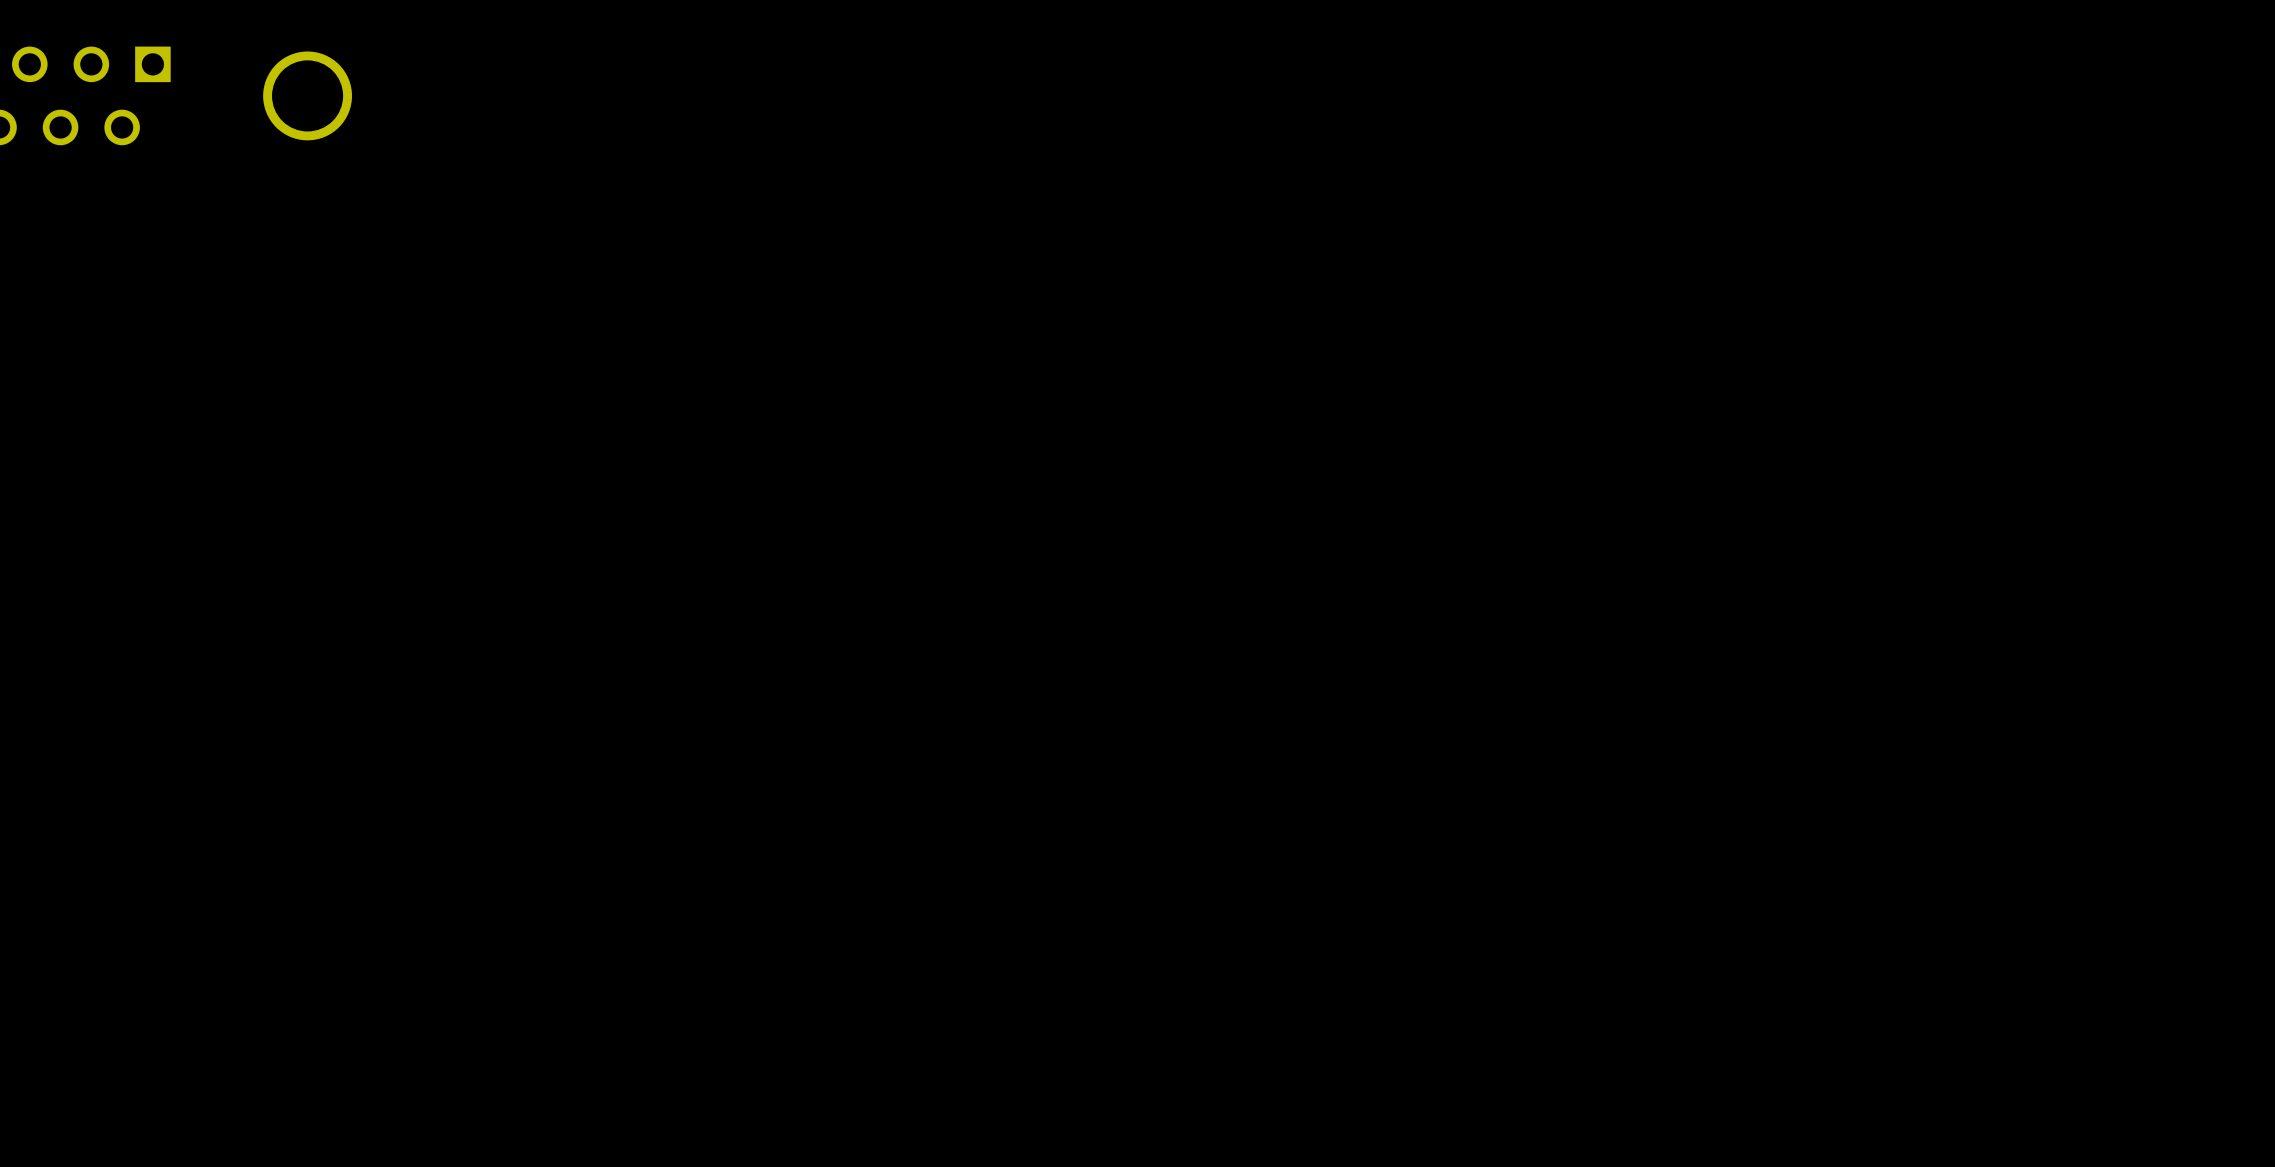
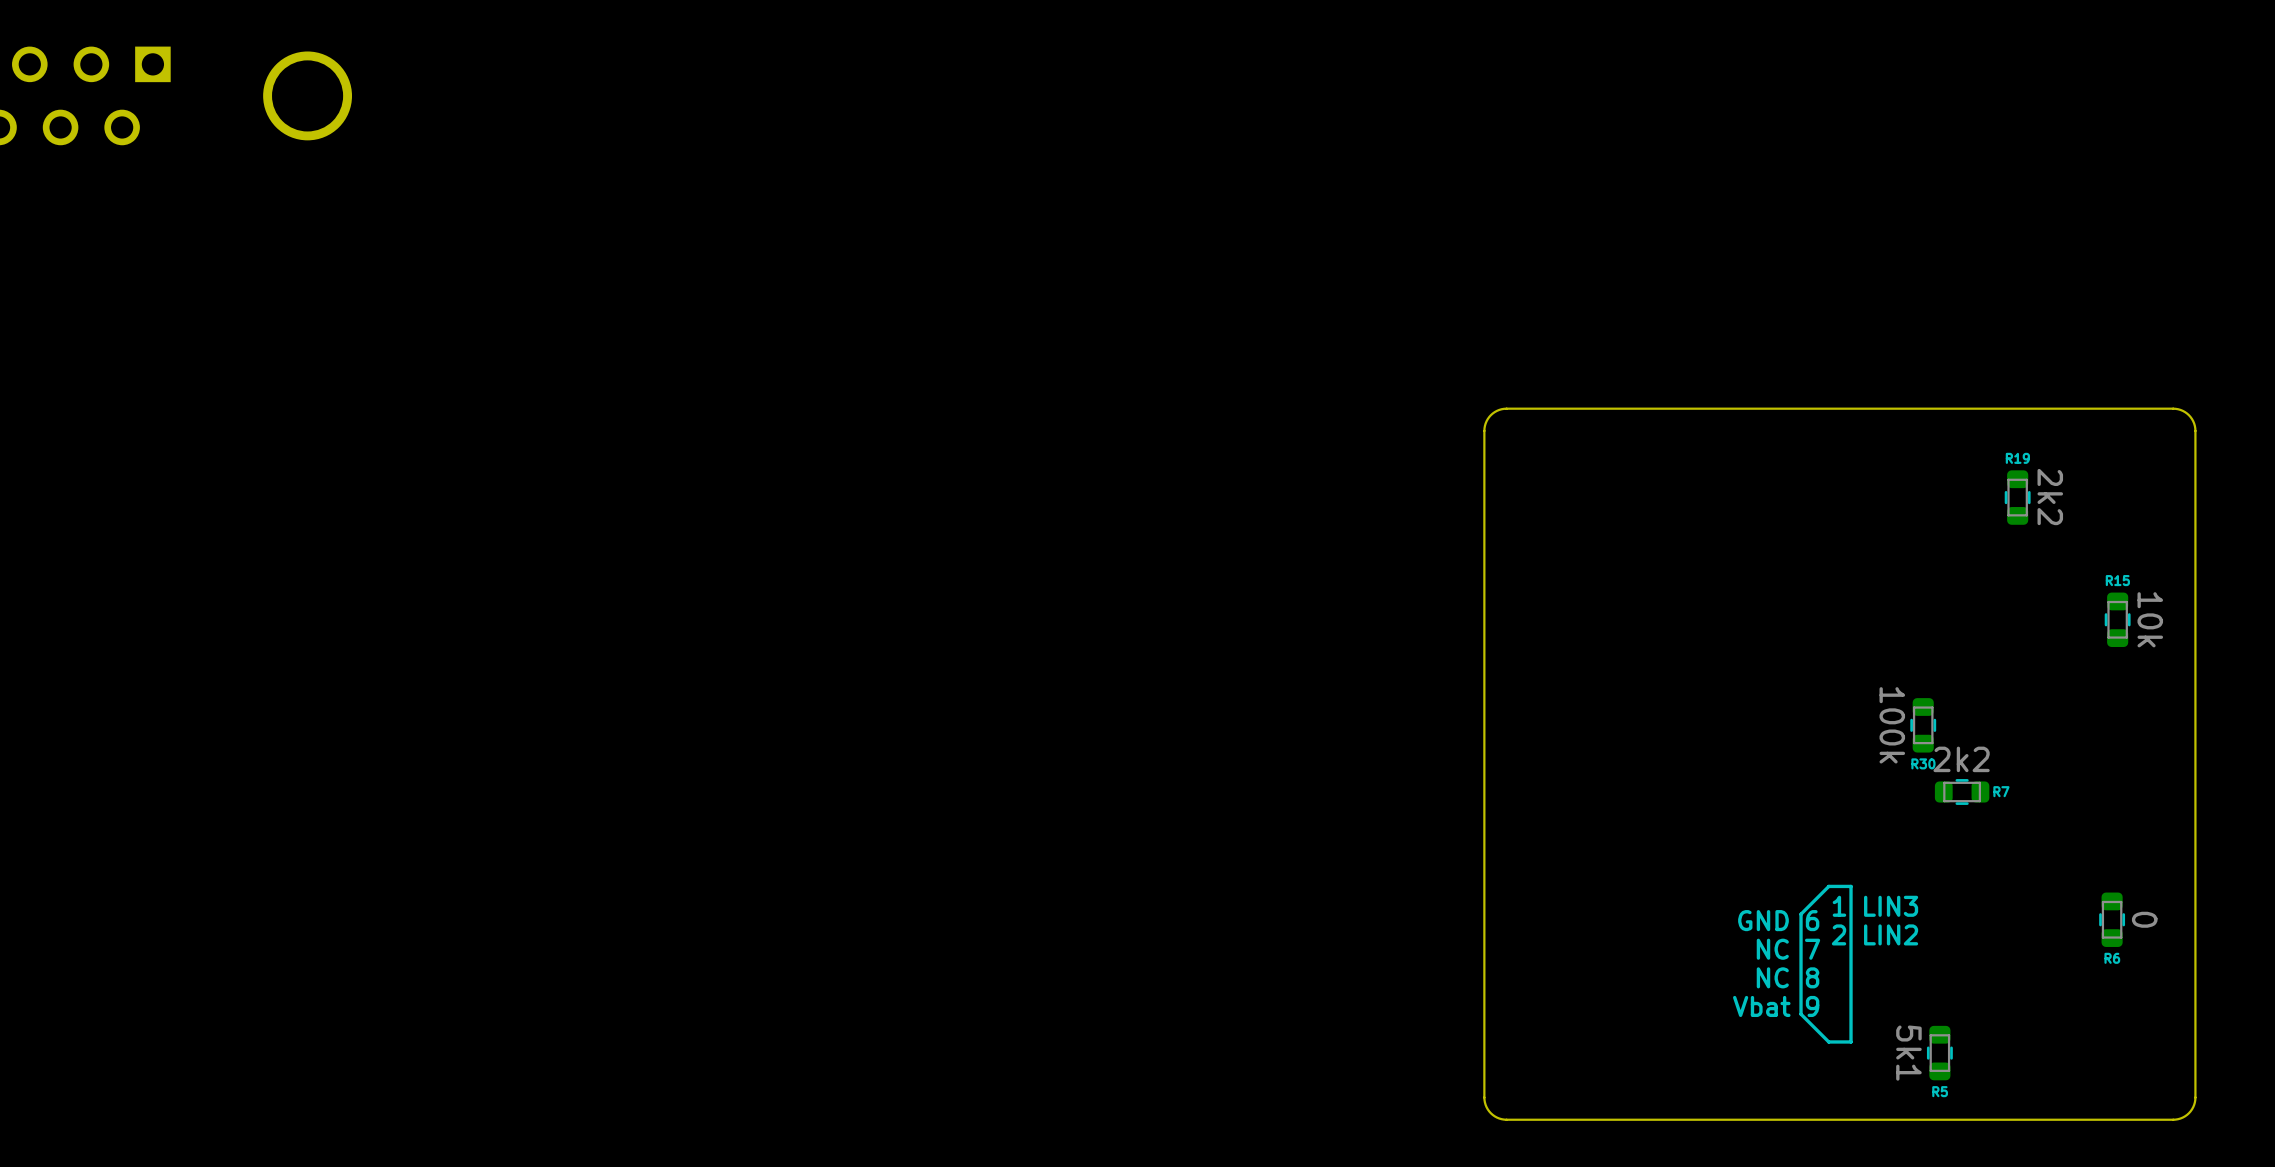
board edge: none -> (2173, 408) (1506, 408) (1496, 410) (1490, 415) (1485, 423) (1484, 430) (1484, 1097) (1486, 1107) (1490, 1113) (1496, 1117) (1506, 1119) (2173, 1119) (2180, 1118) (2188, 1113) (2194, 1104) (2195, 1097) (2195, 430) (2194, 423) (2188, 415) (2180, 409) (2173, 408)
R19: none -> 2k2 (2017, 497)
R15: none -> 10k (2117, 619)
R30: none -> 100k (1923, 725)
R7: none -> 2k2 (1962, 791)
line: none -> (1851, 886) (1851, 1041) (1828, 1041) (1801, 1014) (1801, 914) (1828, 886) (1851, 886)
text: none -> 1 LIN3 (1875, 906)
R6: none -> 0 (2112, 919)
text: none -> GND 6 (1778, 920)
text: none -> 2 LIN2 (1875, 934)
text: none -> NC 7 (1788, 949)
text: none -> NC 8 (1788, 977)
text: none -> Vbat 9 (1776, 1006)
R5: none -> 5k1 (1939, 1053)

